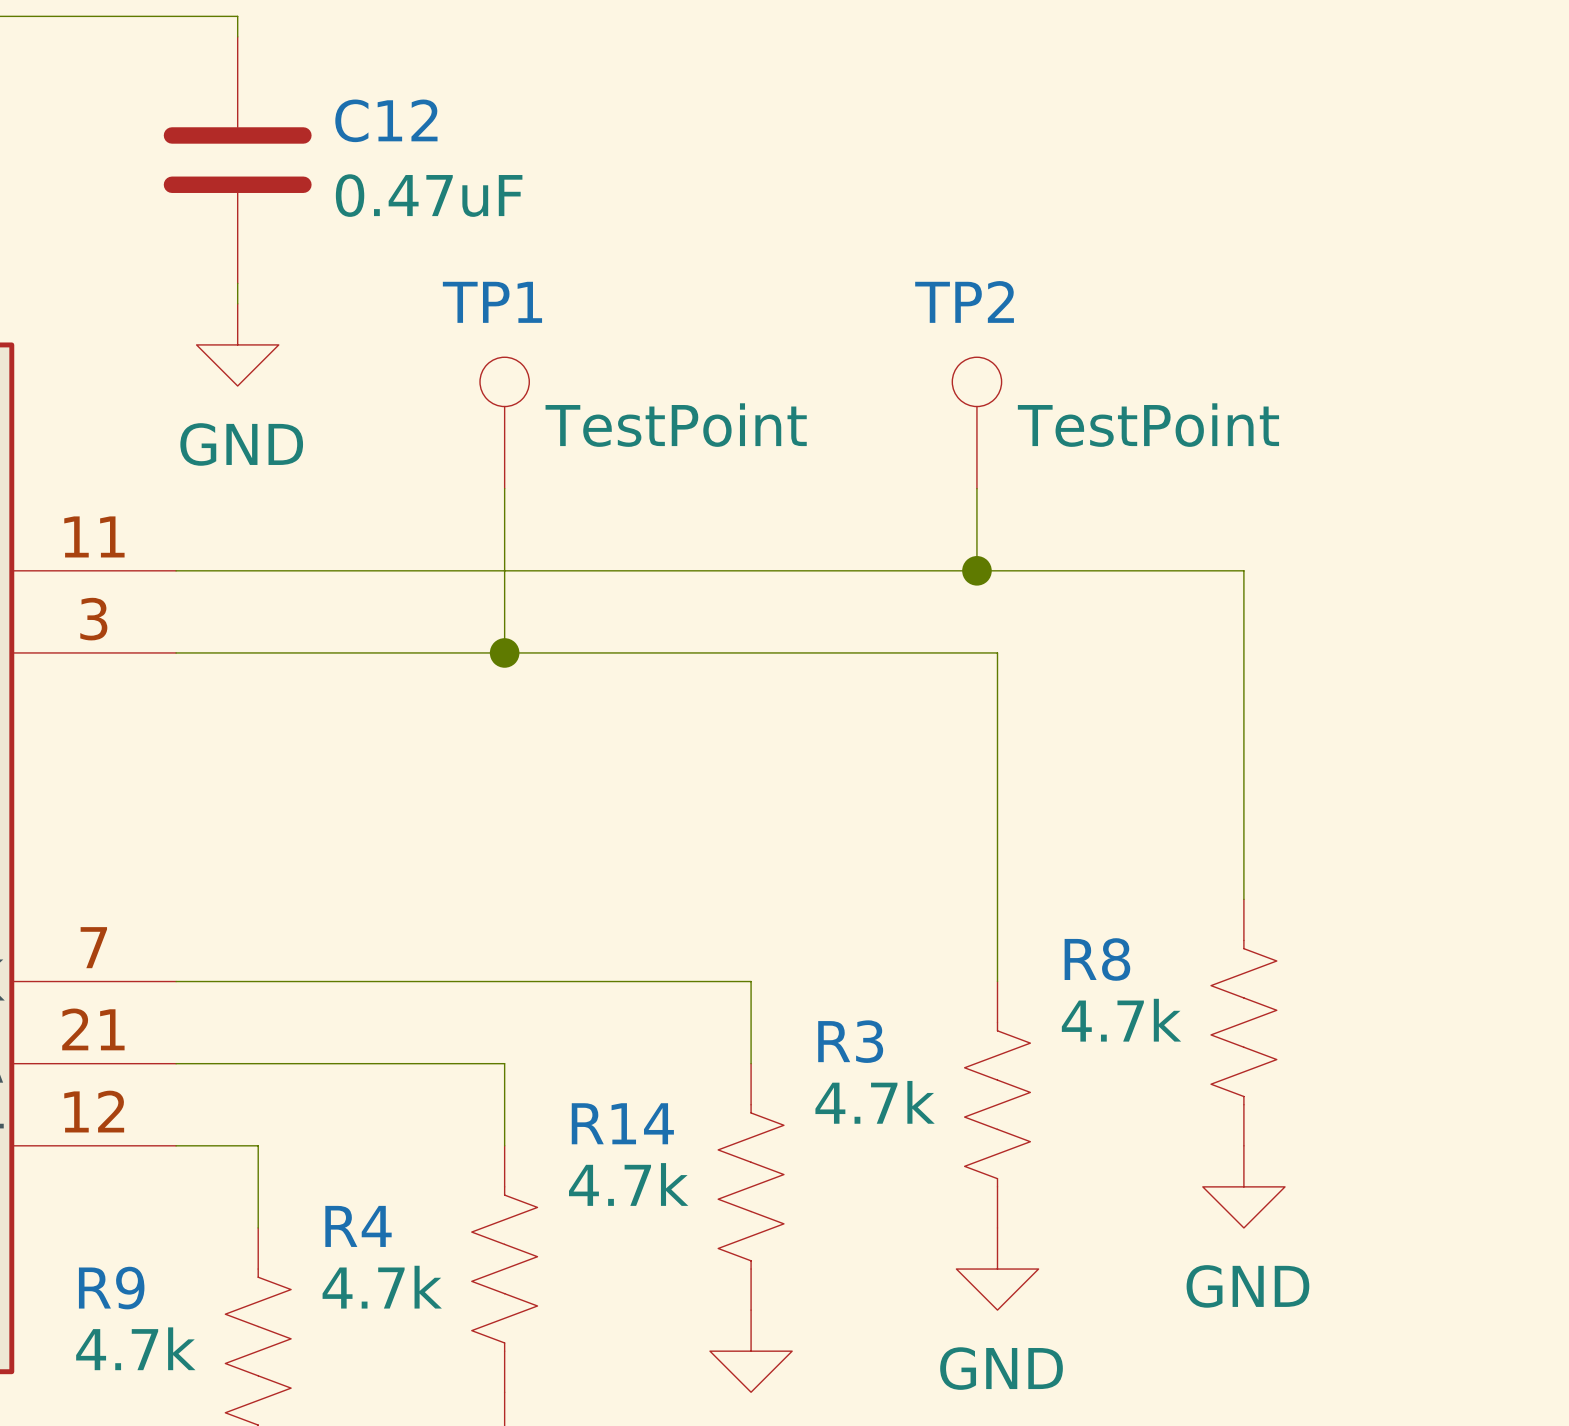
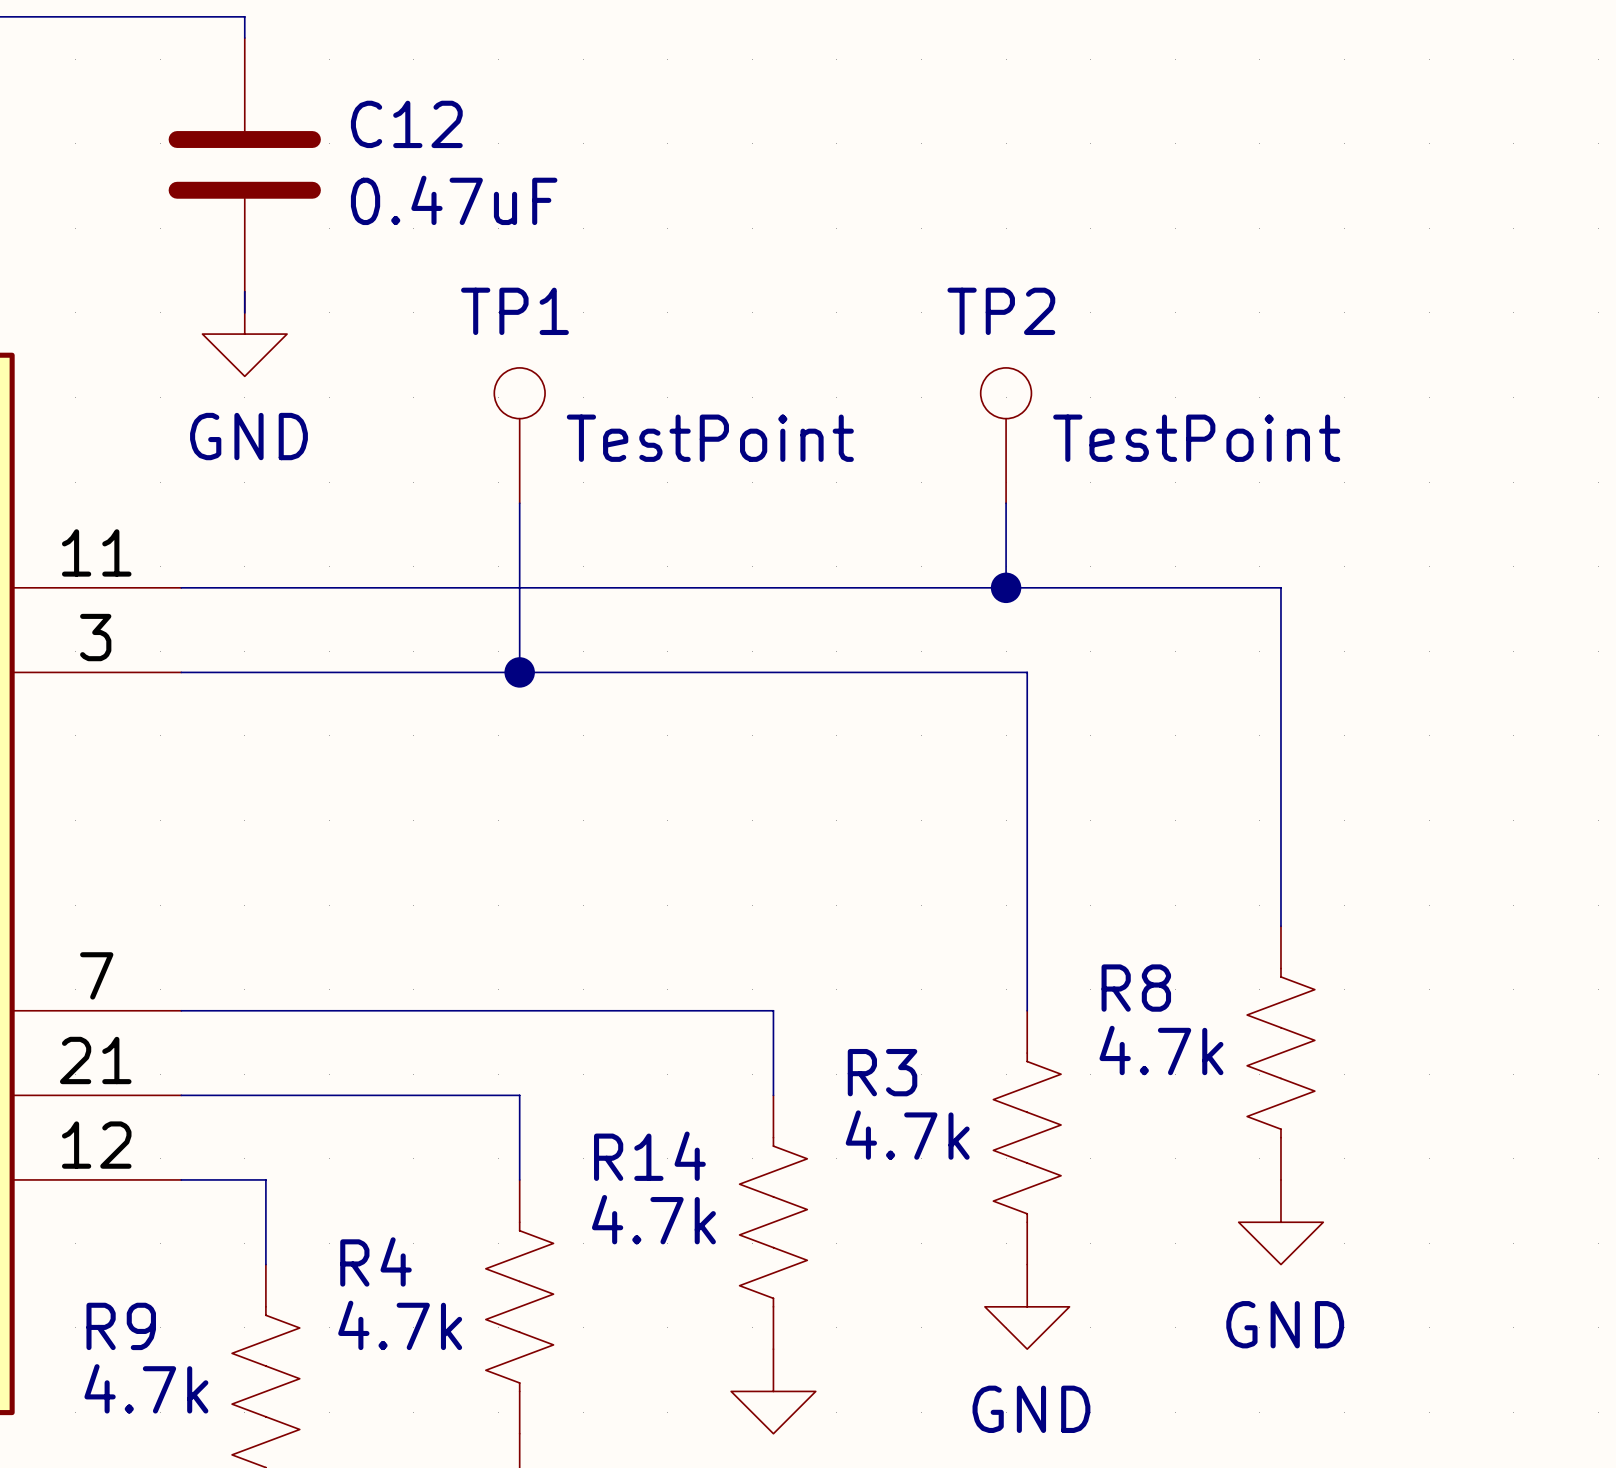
power symbol position: GND (237, 344) -> GND (244, 334)

